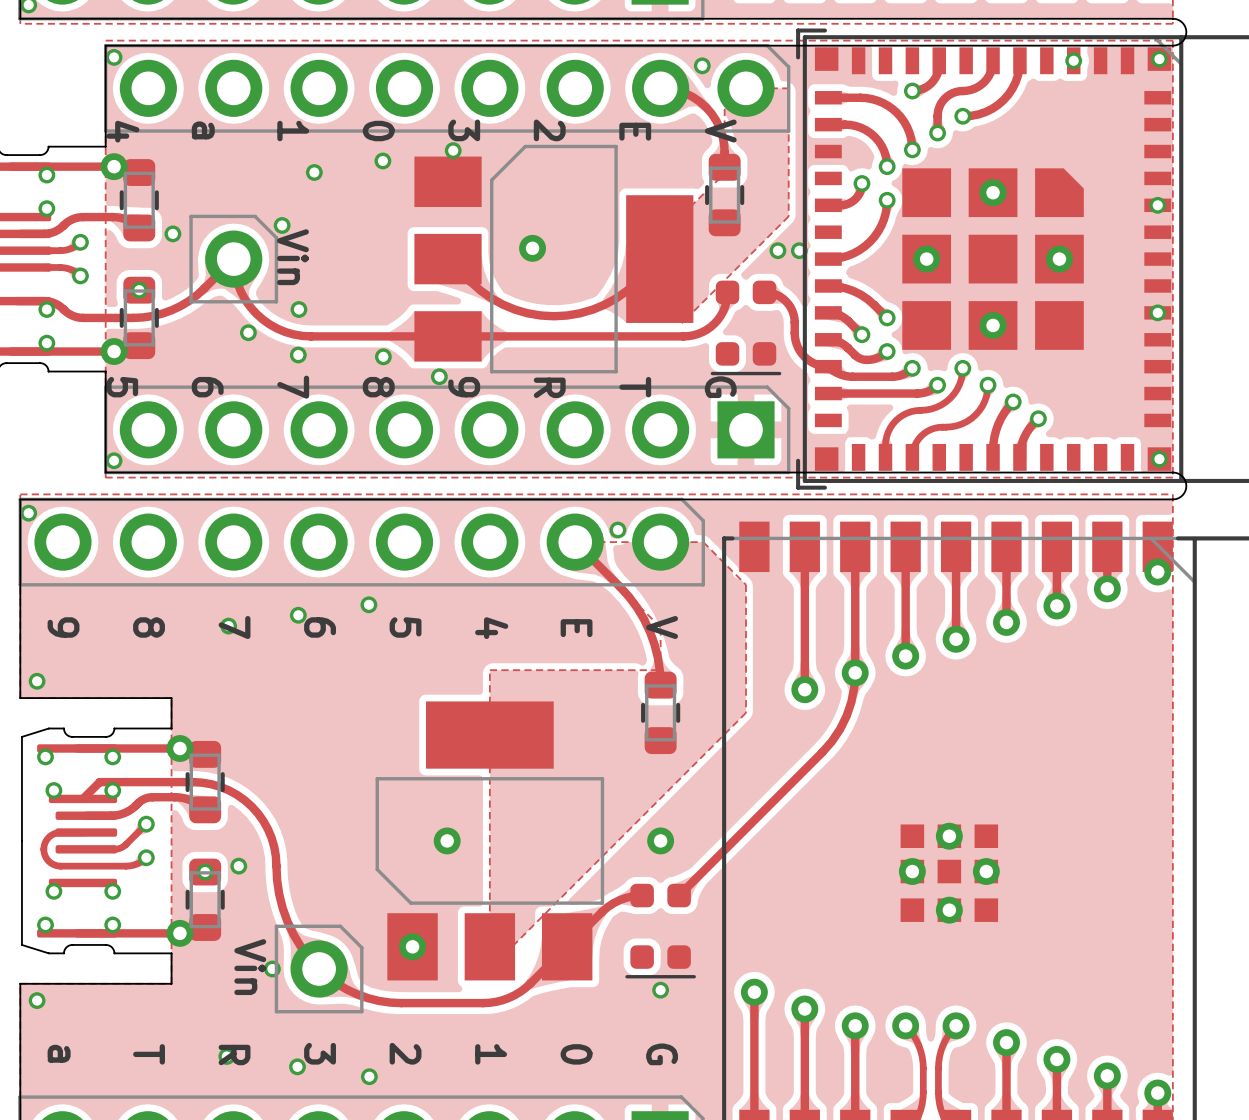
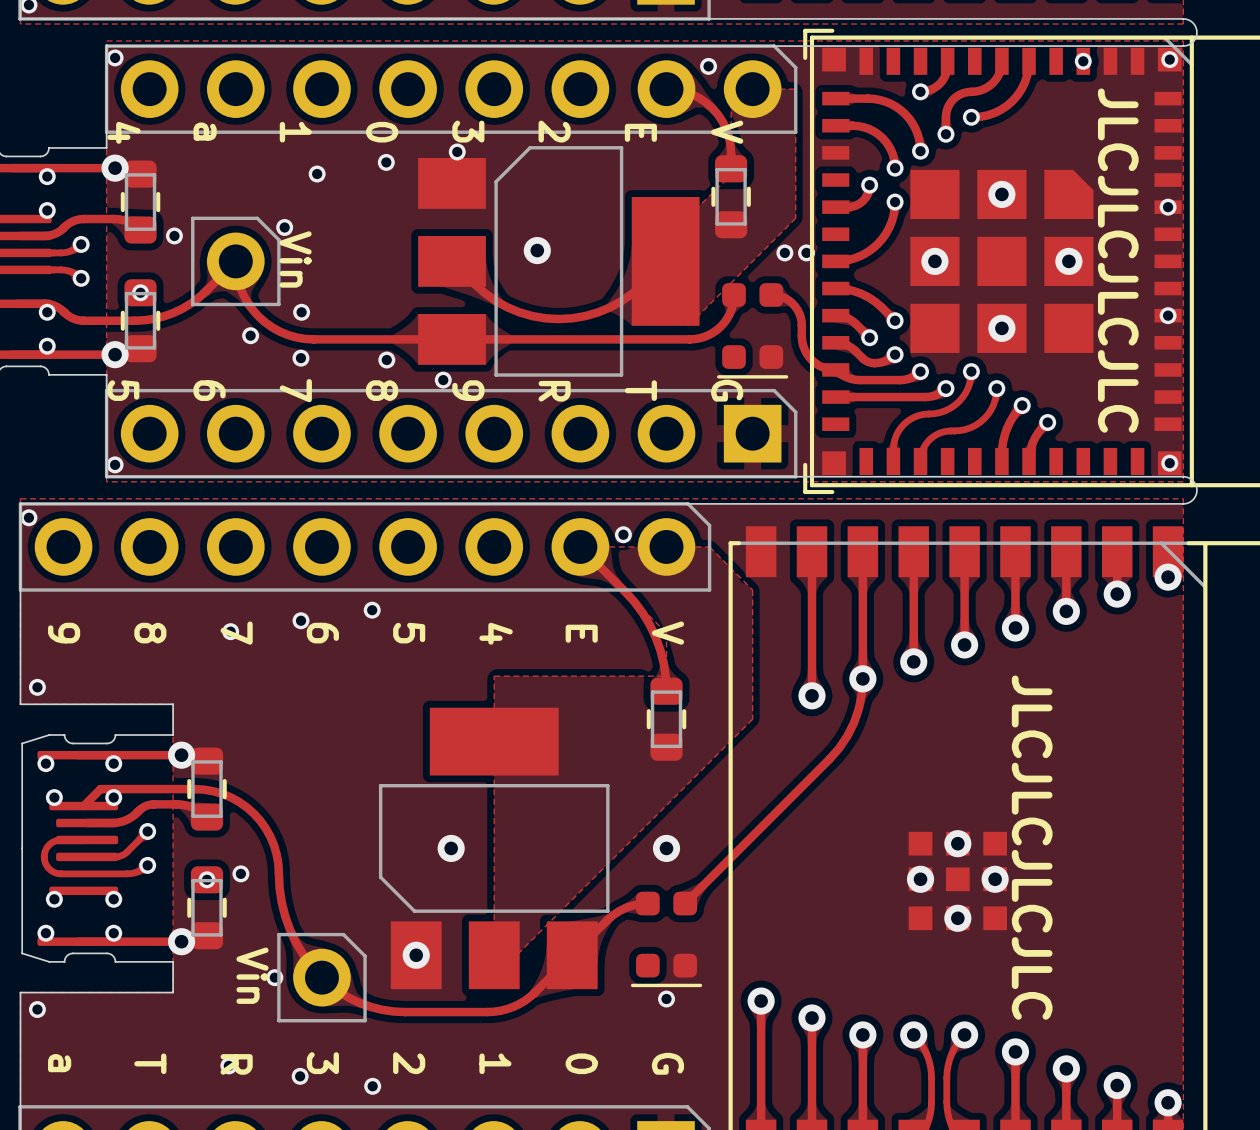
text: none -> JLCJLCJLCJLC (1118, 260)
text: none -> JLCJLCJLCJLC (1032, 847)

